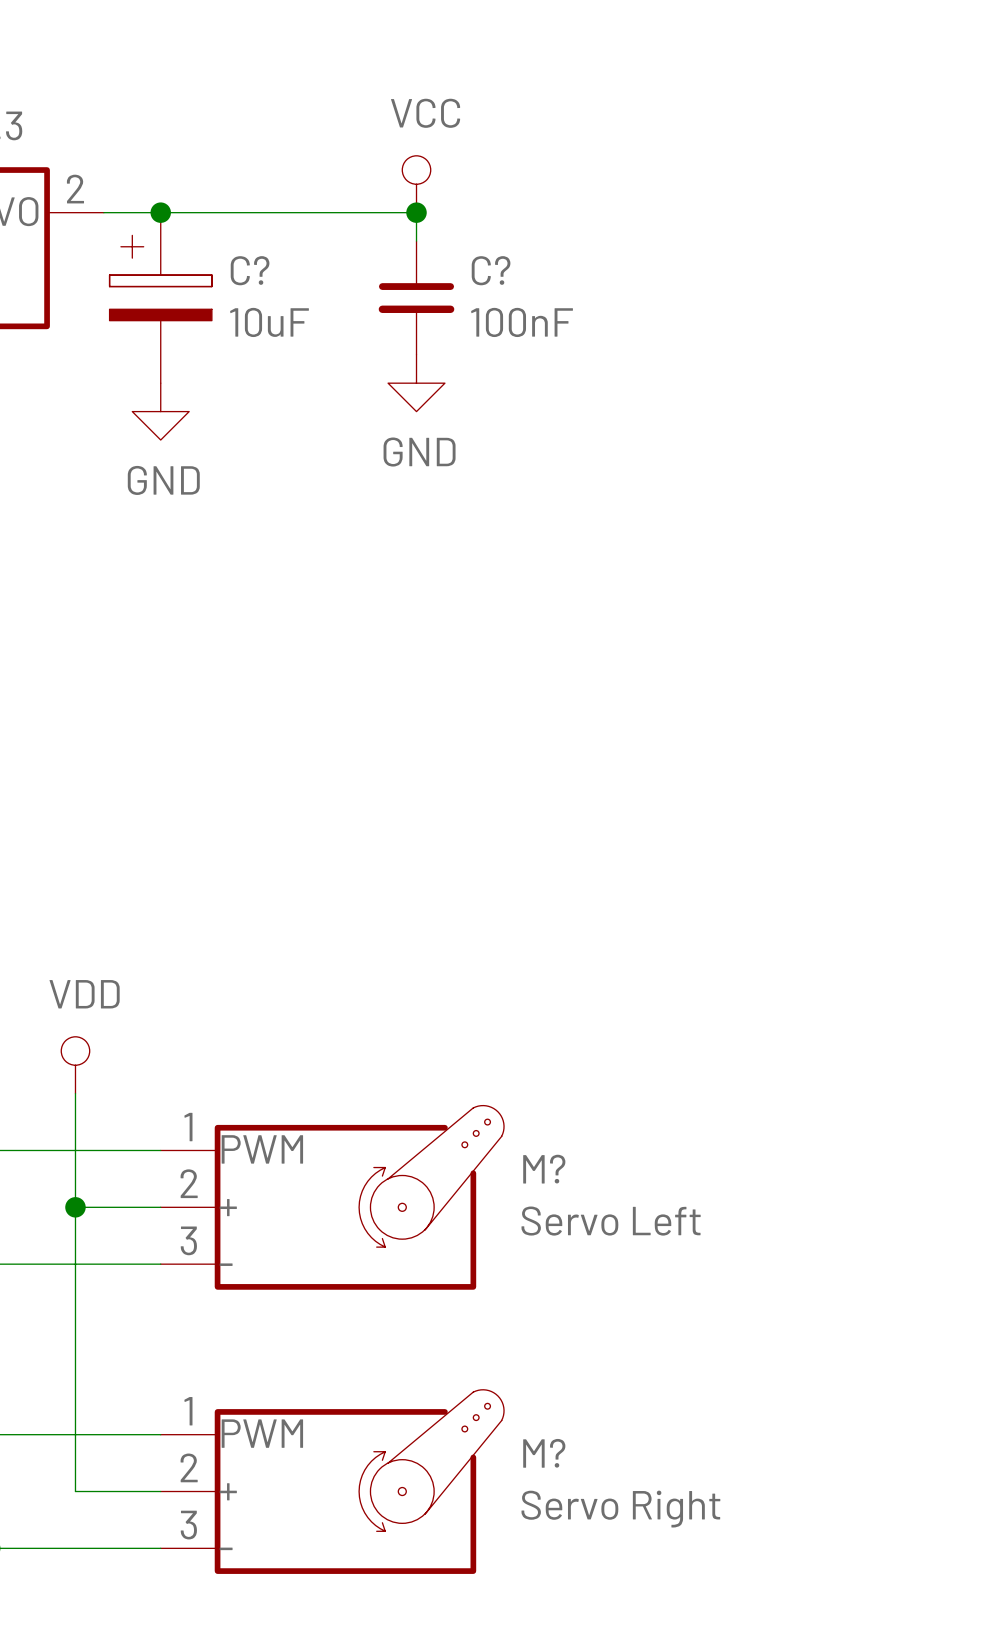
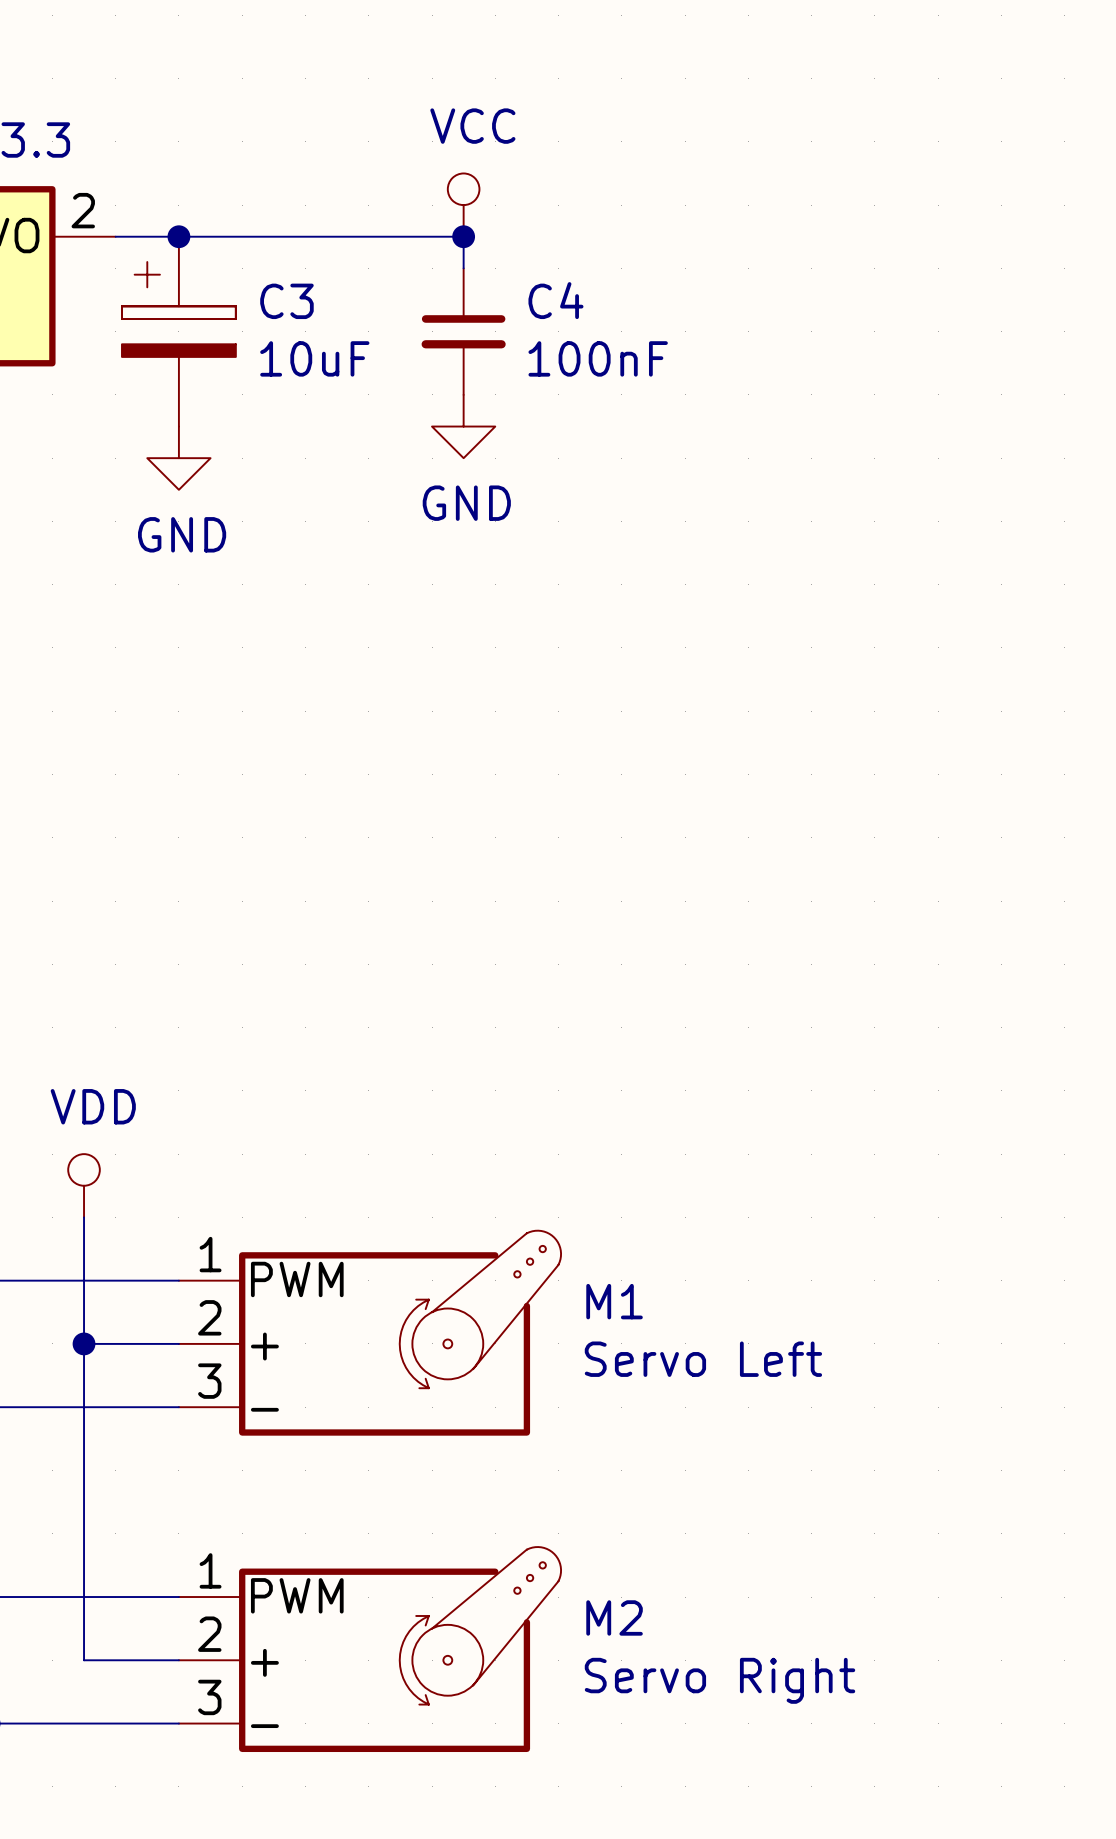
C? name: C? (250, 270) -> C3 (286, 301)
C? name: C? (491, 270) -> C4 (555, 300)
M? name: M? (544, 1169) -> M1 (614, 1301)
M? name: M? (544, 1453) -> M2 (614, 1617)

